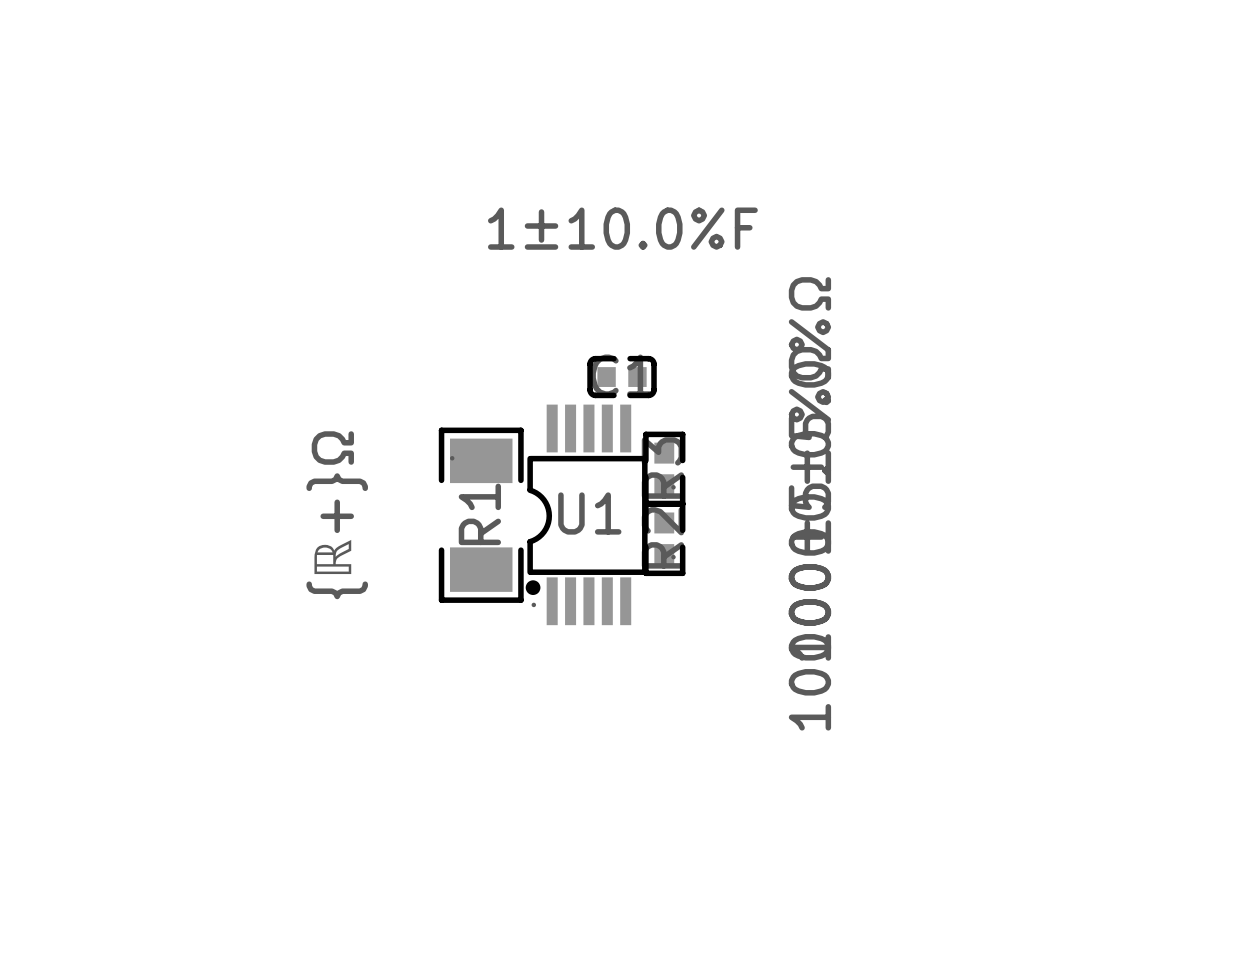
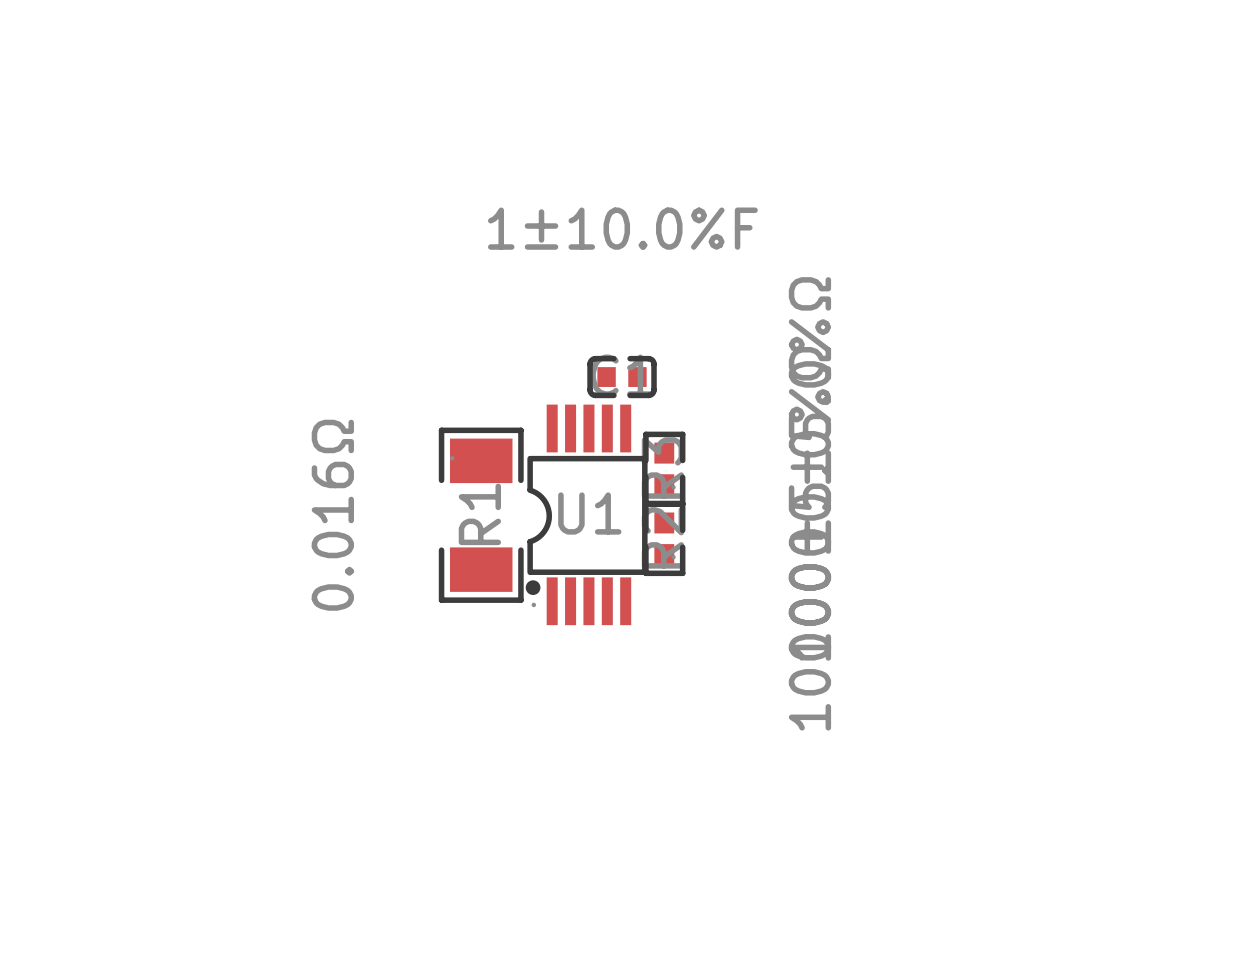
R1 value: {ℝ+}Ω (337, 515) -> 0.016Ω (332, 515)

